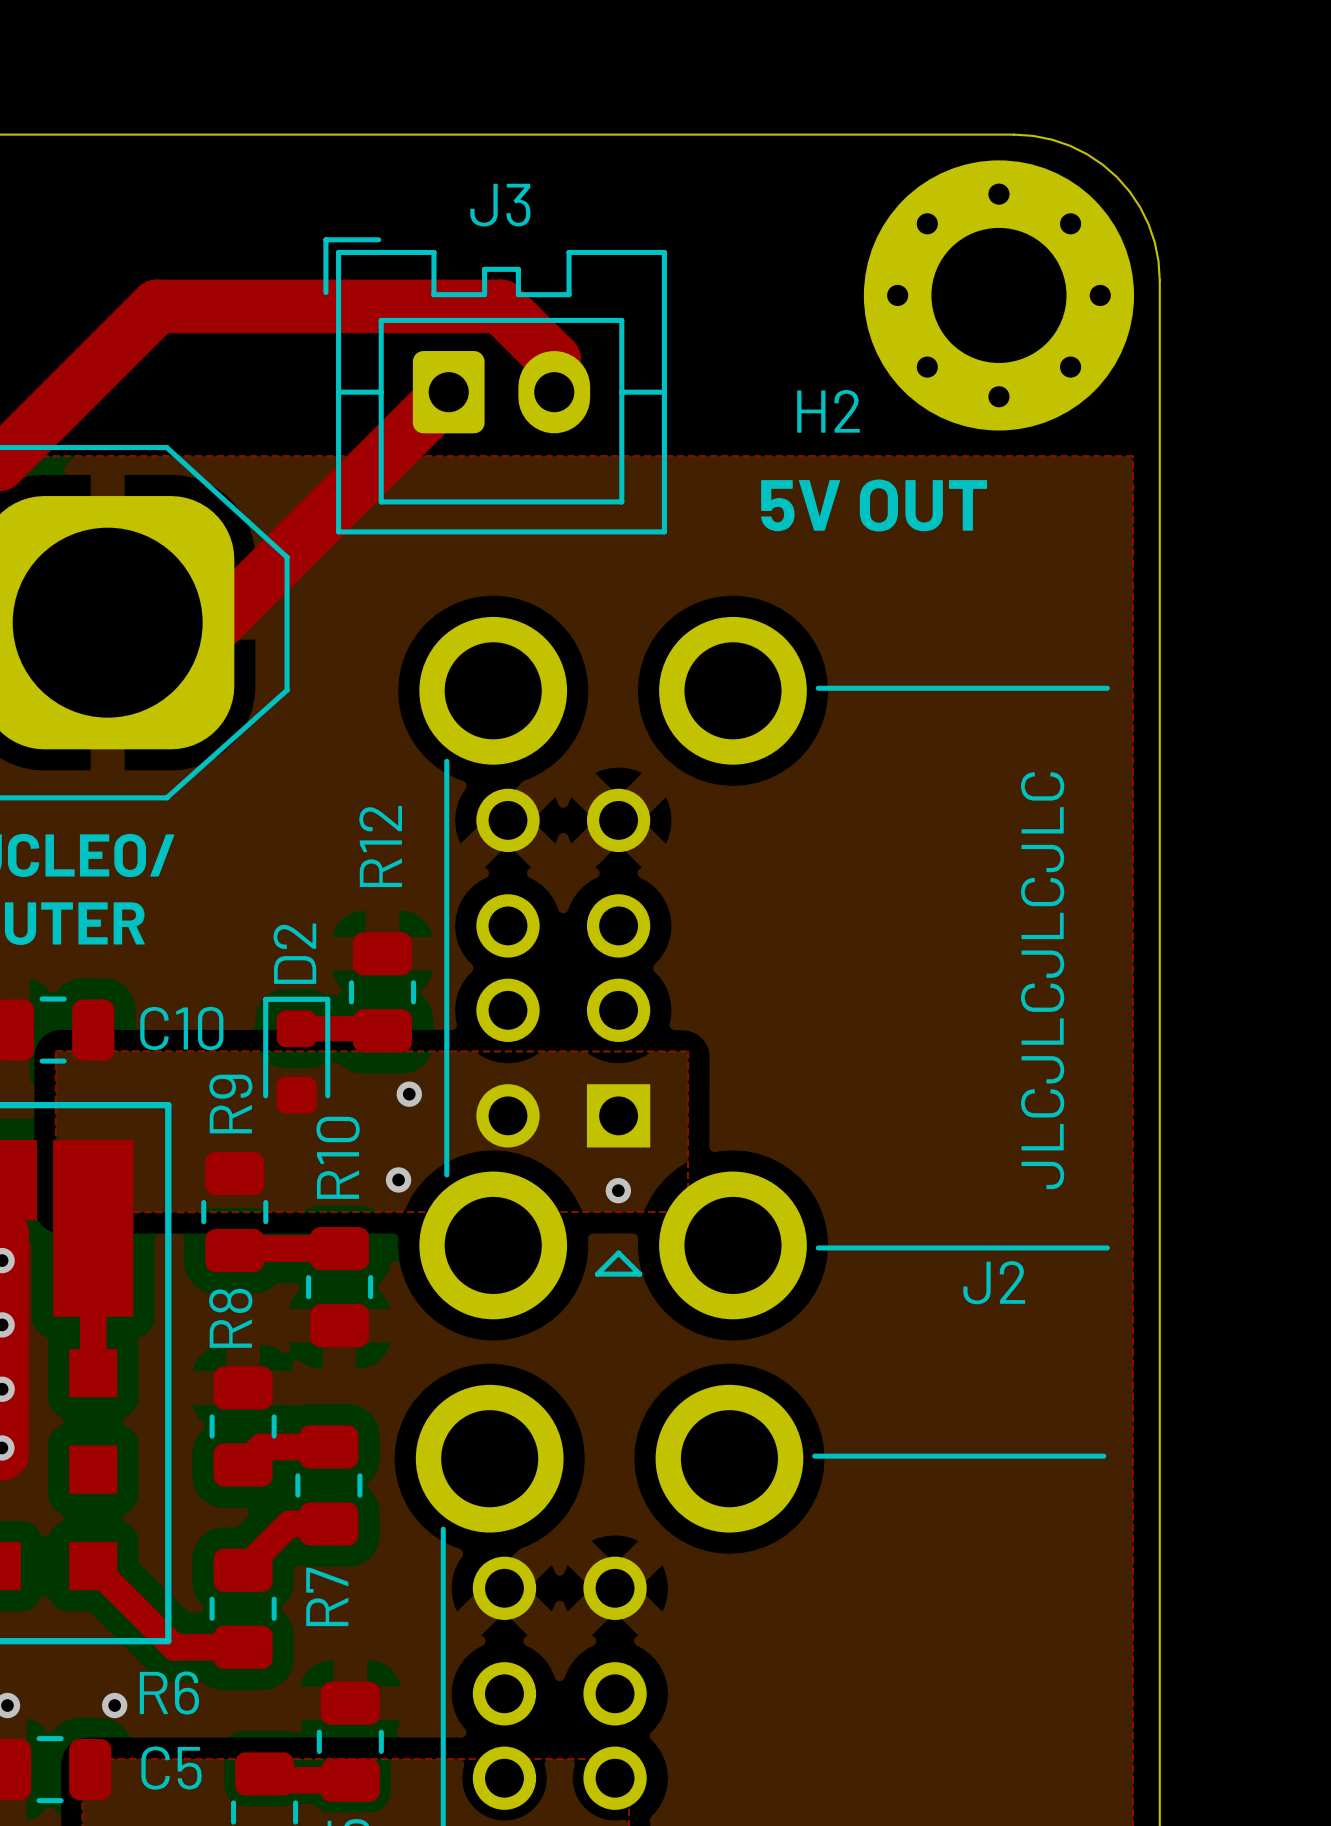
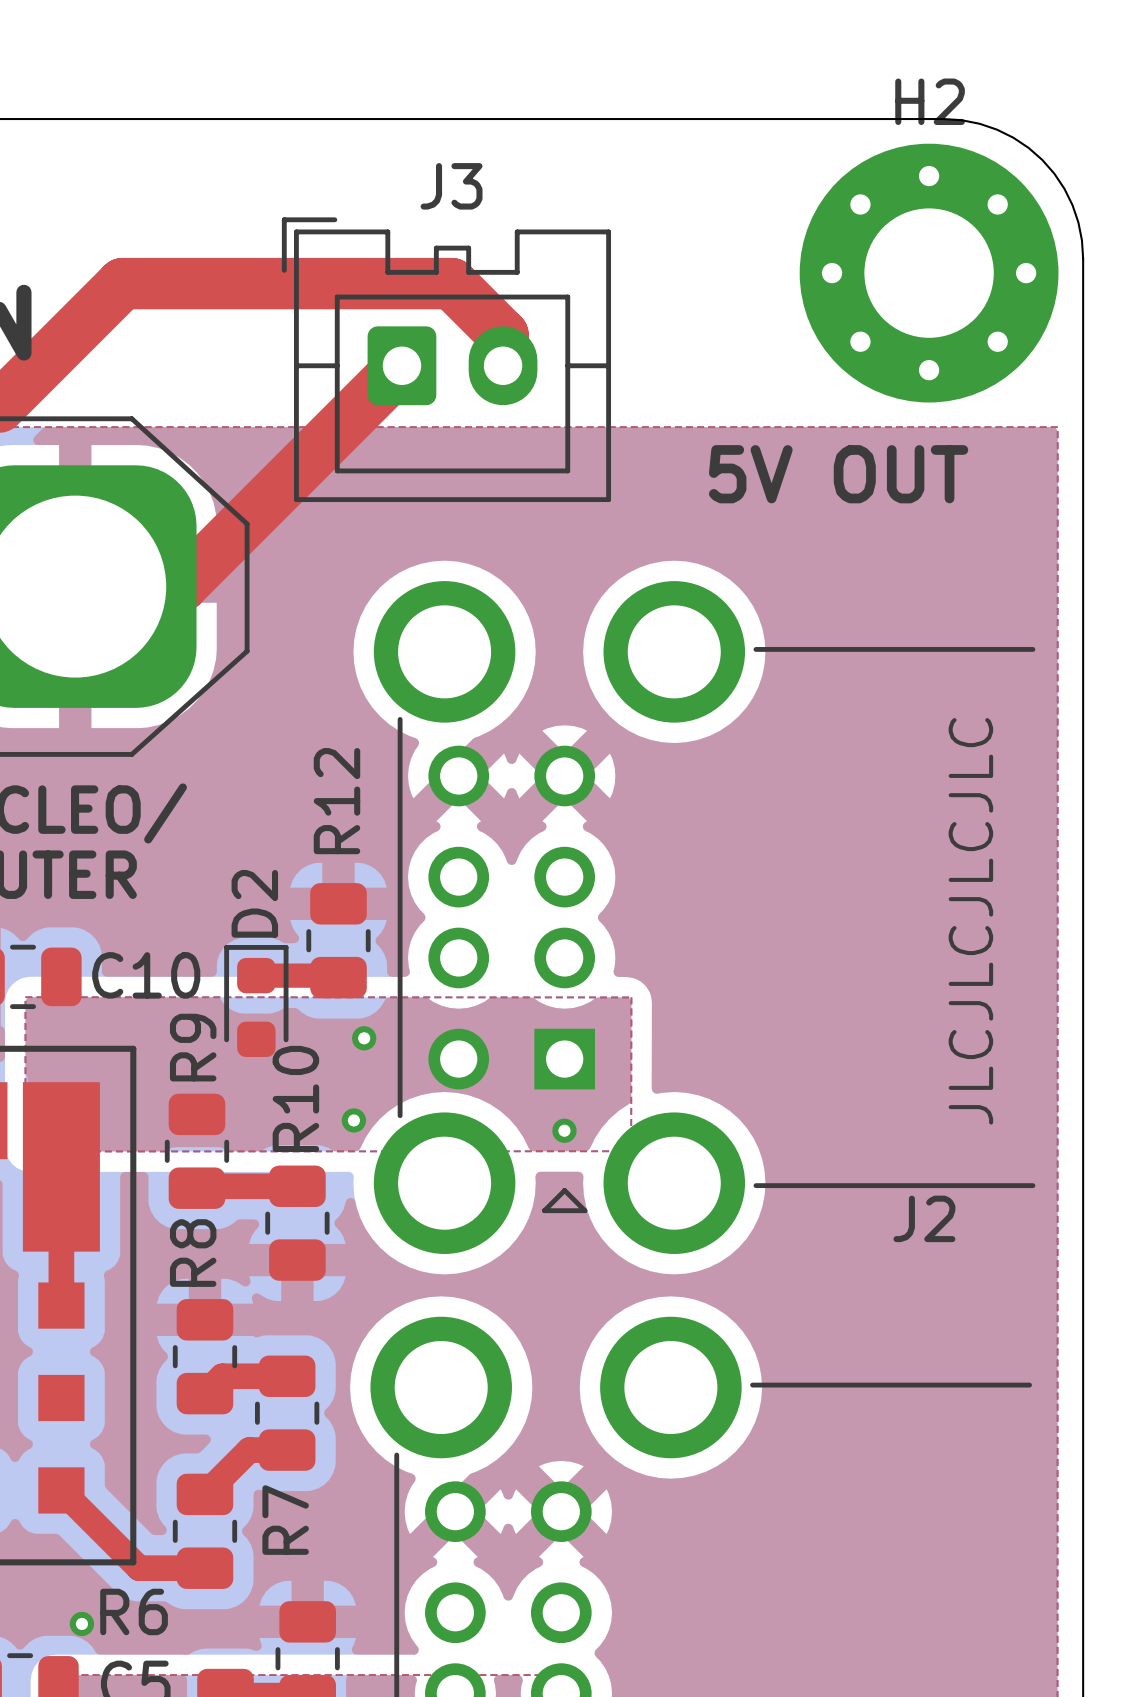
H2 name position: H2 (828, 411) -> H2 (930, 101)

